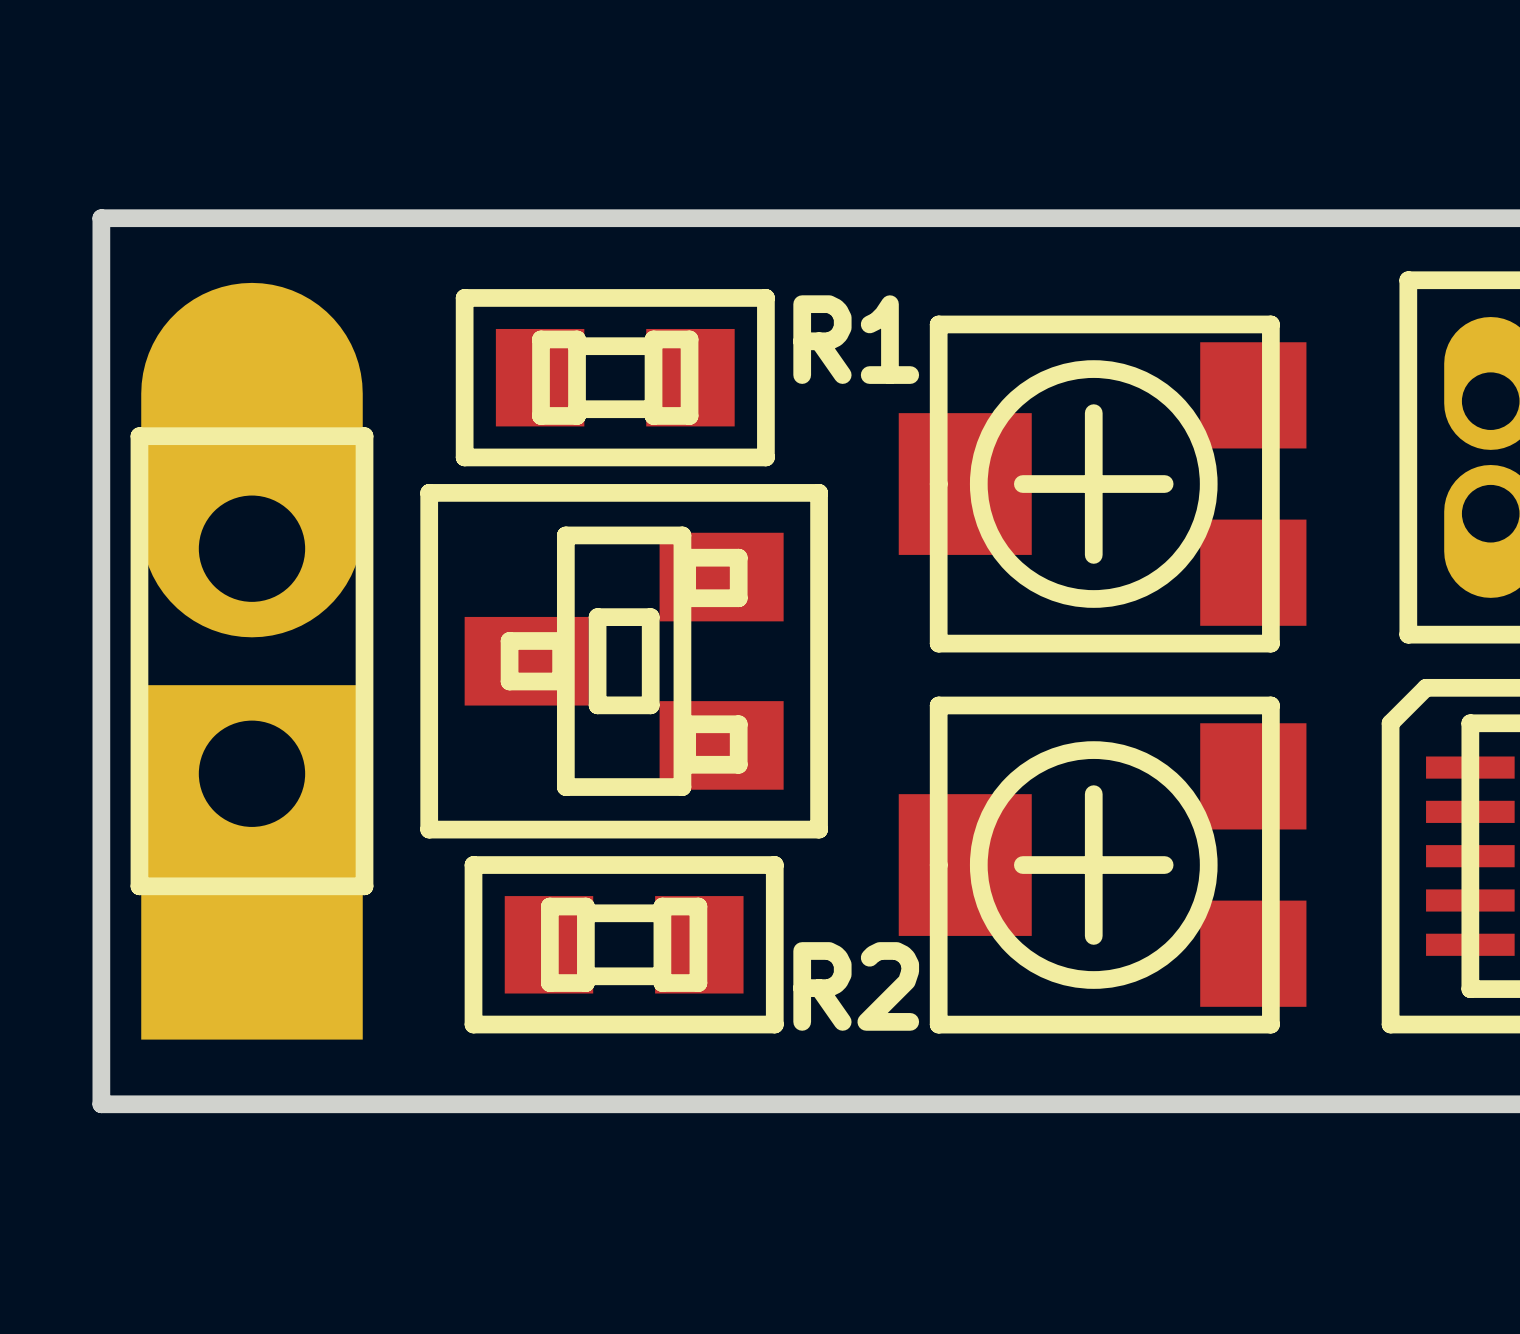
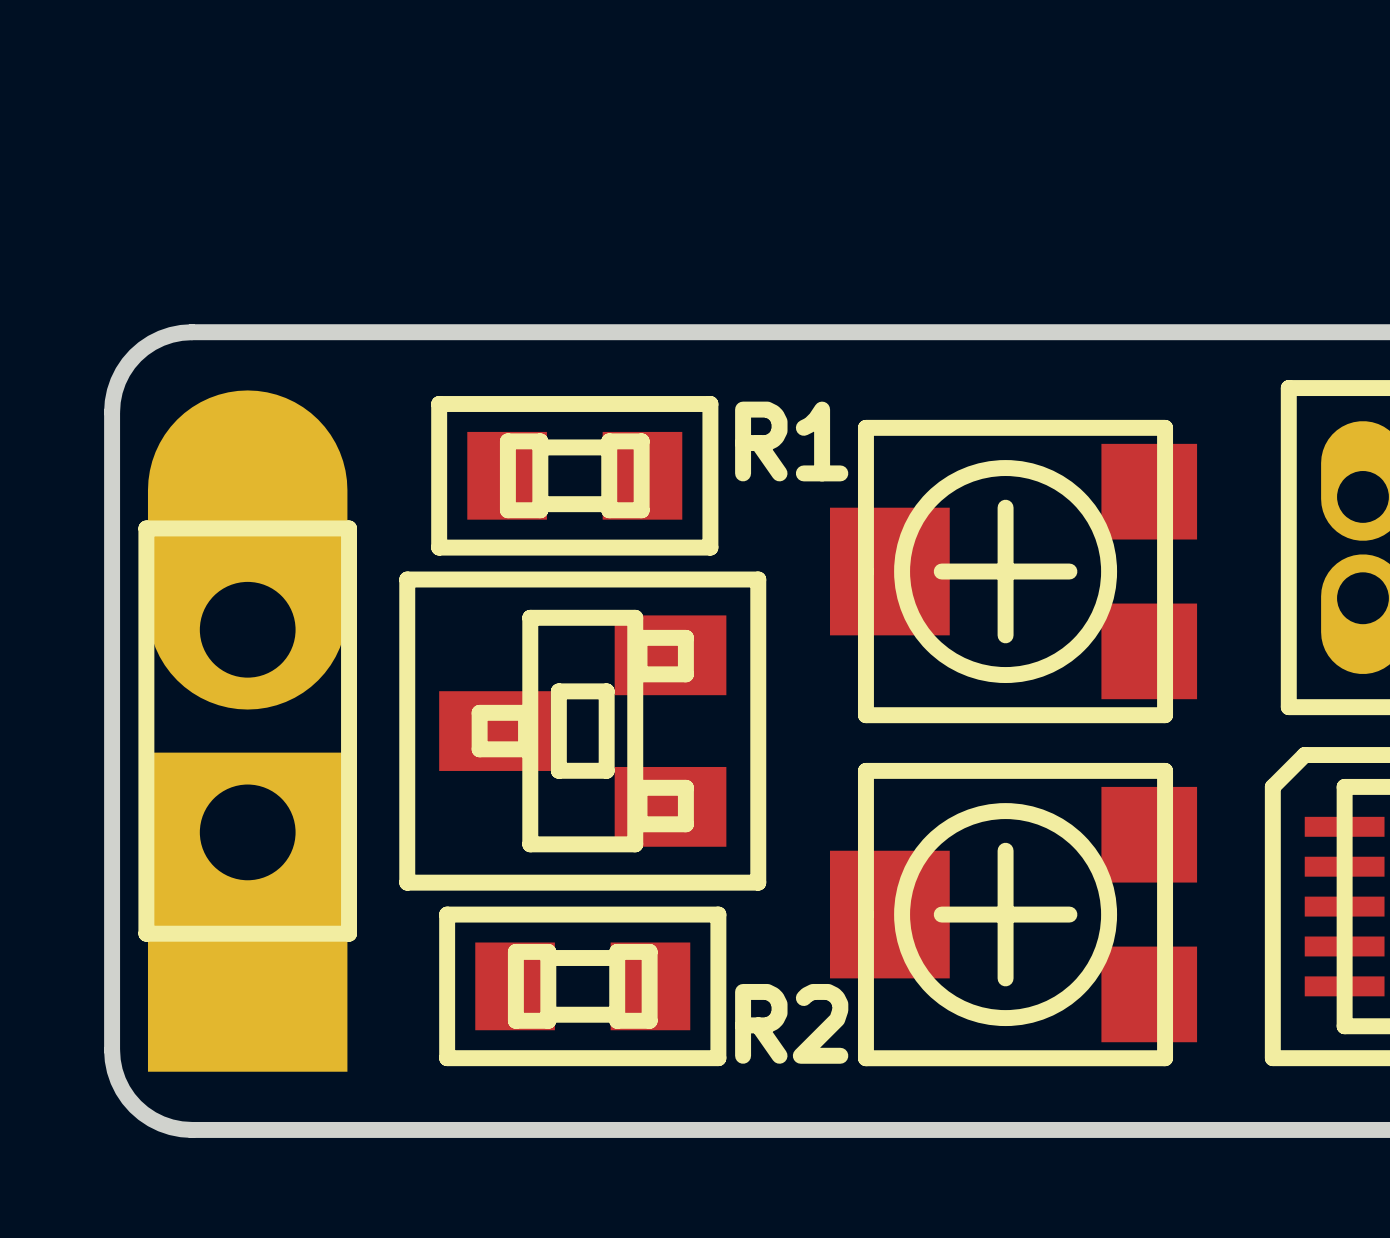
board edge: (189, 218) (101, 218) (101, 306) -> (191, 332) (161, 338) (135, 355) (118, 381) (112, 411)
board edge: (101, 1015) (101, 1104) (189, 1104) -> (112, 1050) (118, 1080) (135, 1106) (161, 1123) (191, 1129)

